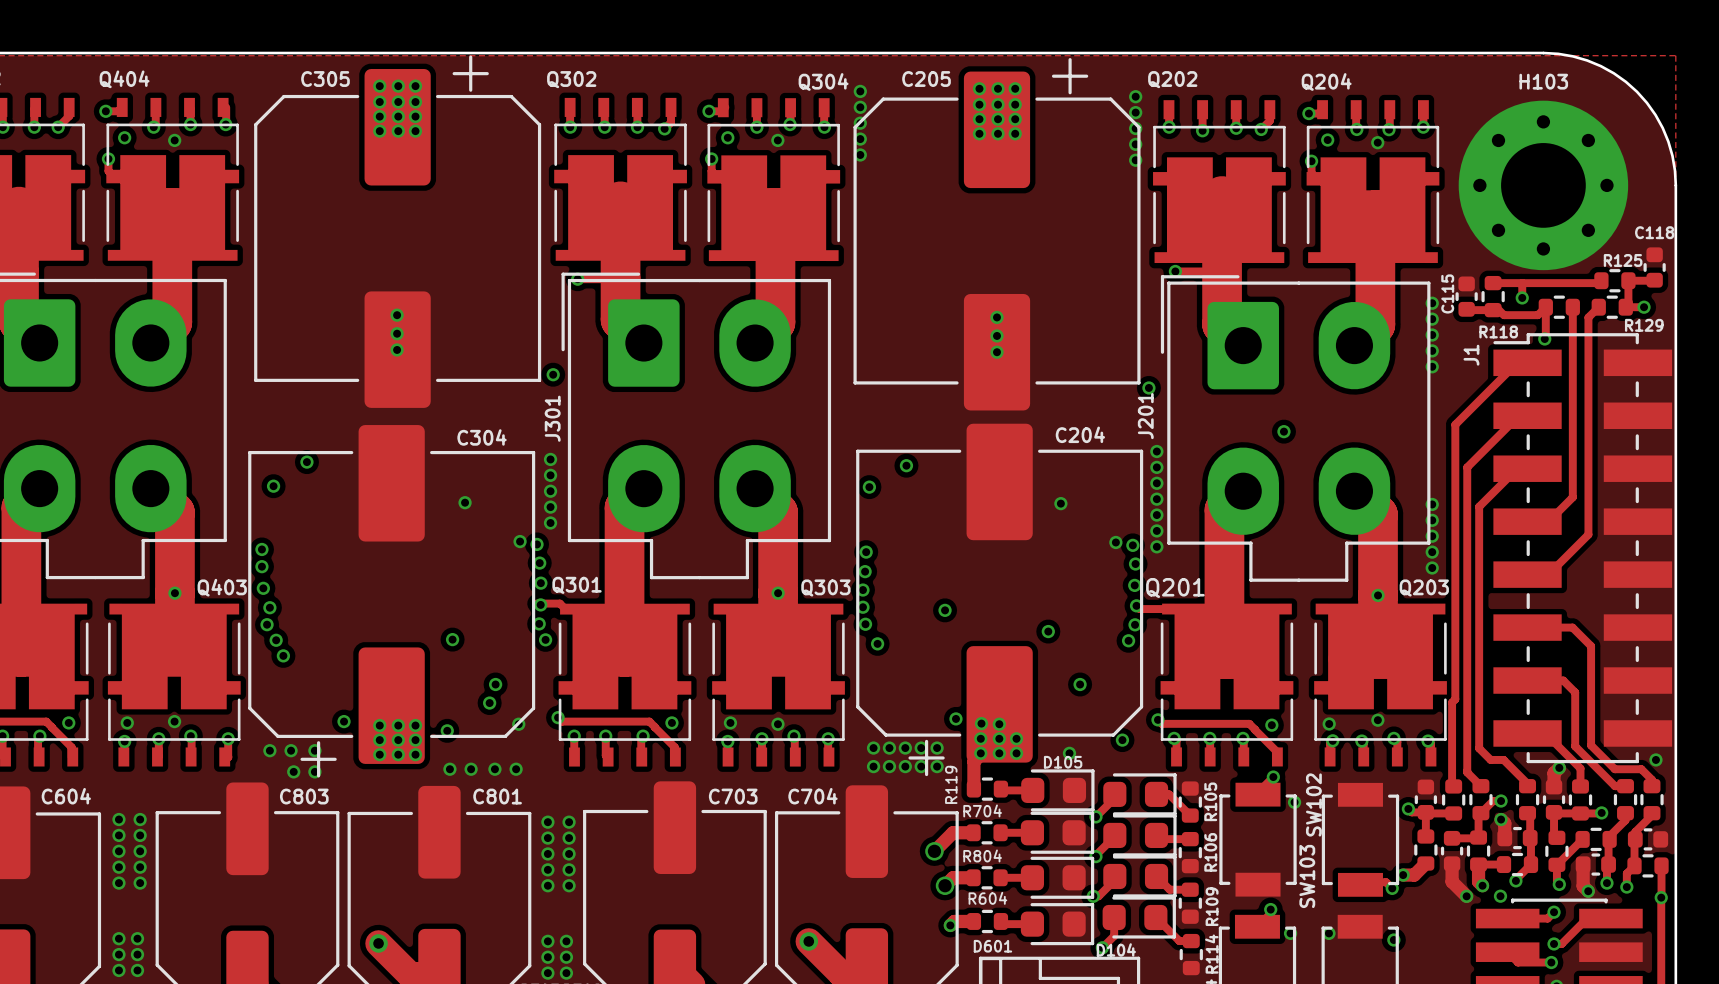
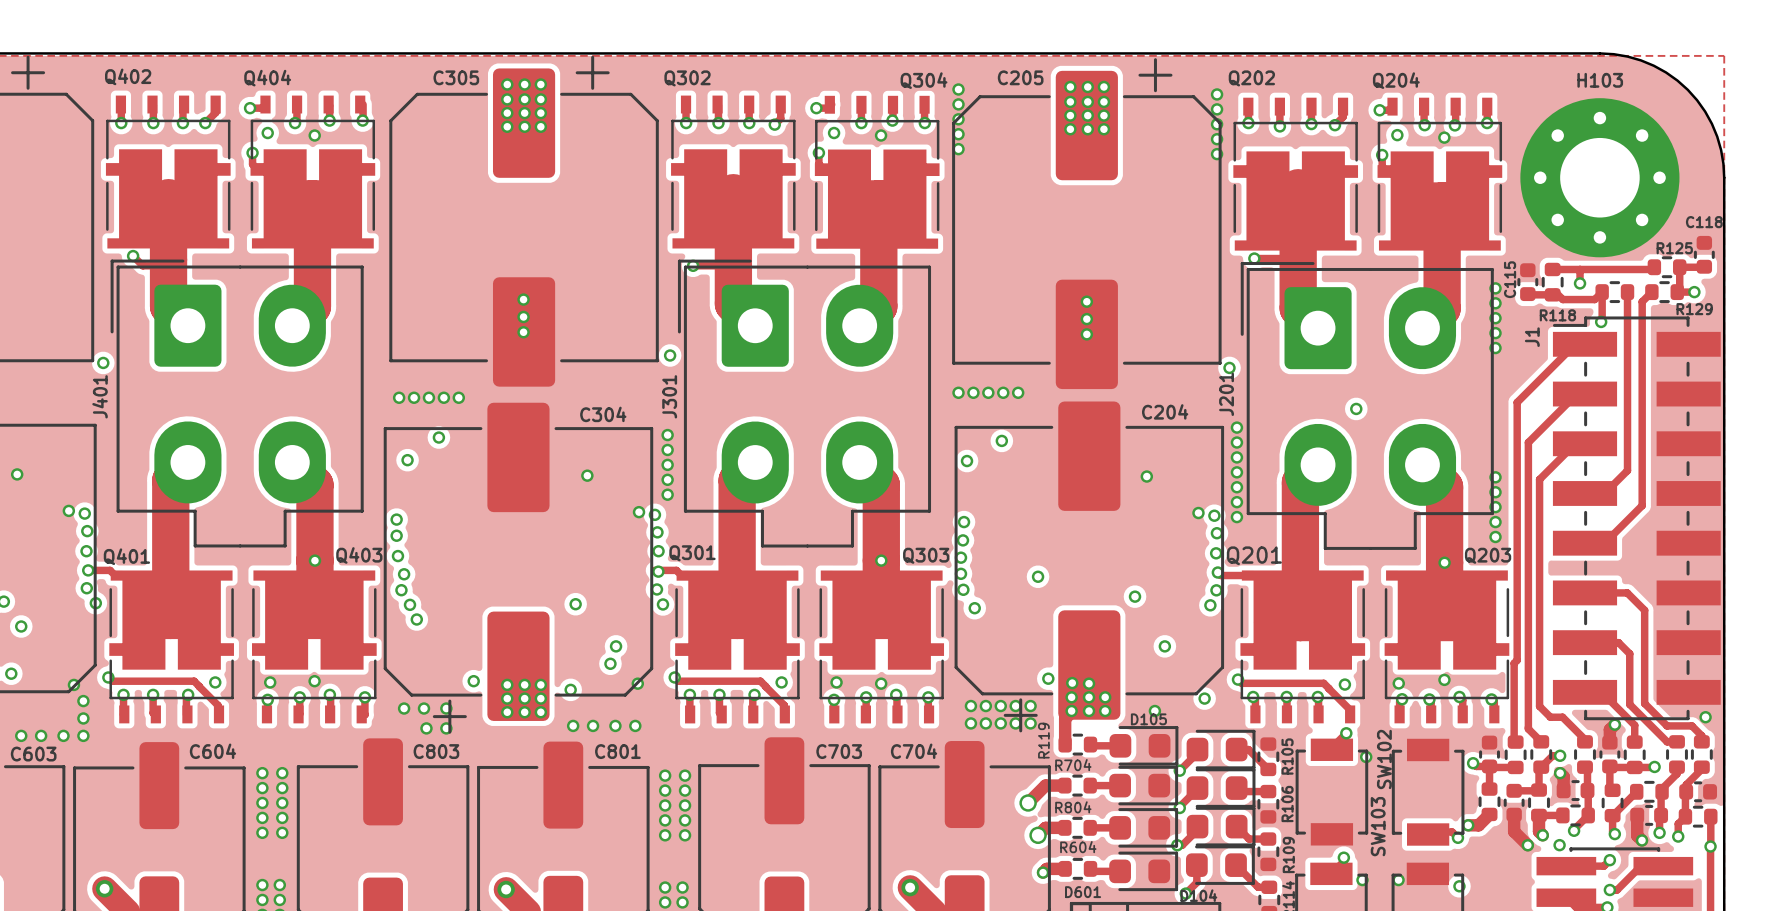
via: none -> (958, 392)
via: none -> (973, 392)
via: none -> (988, 392)
via: none -> (1003, 392)
via: none -> (1018, 392)
via: none -> (399, 397)
via: none -> (414, 397)
via: none -> (428, 397)
via: none -> (443, 397)
via: none -> (458, 397)

